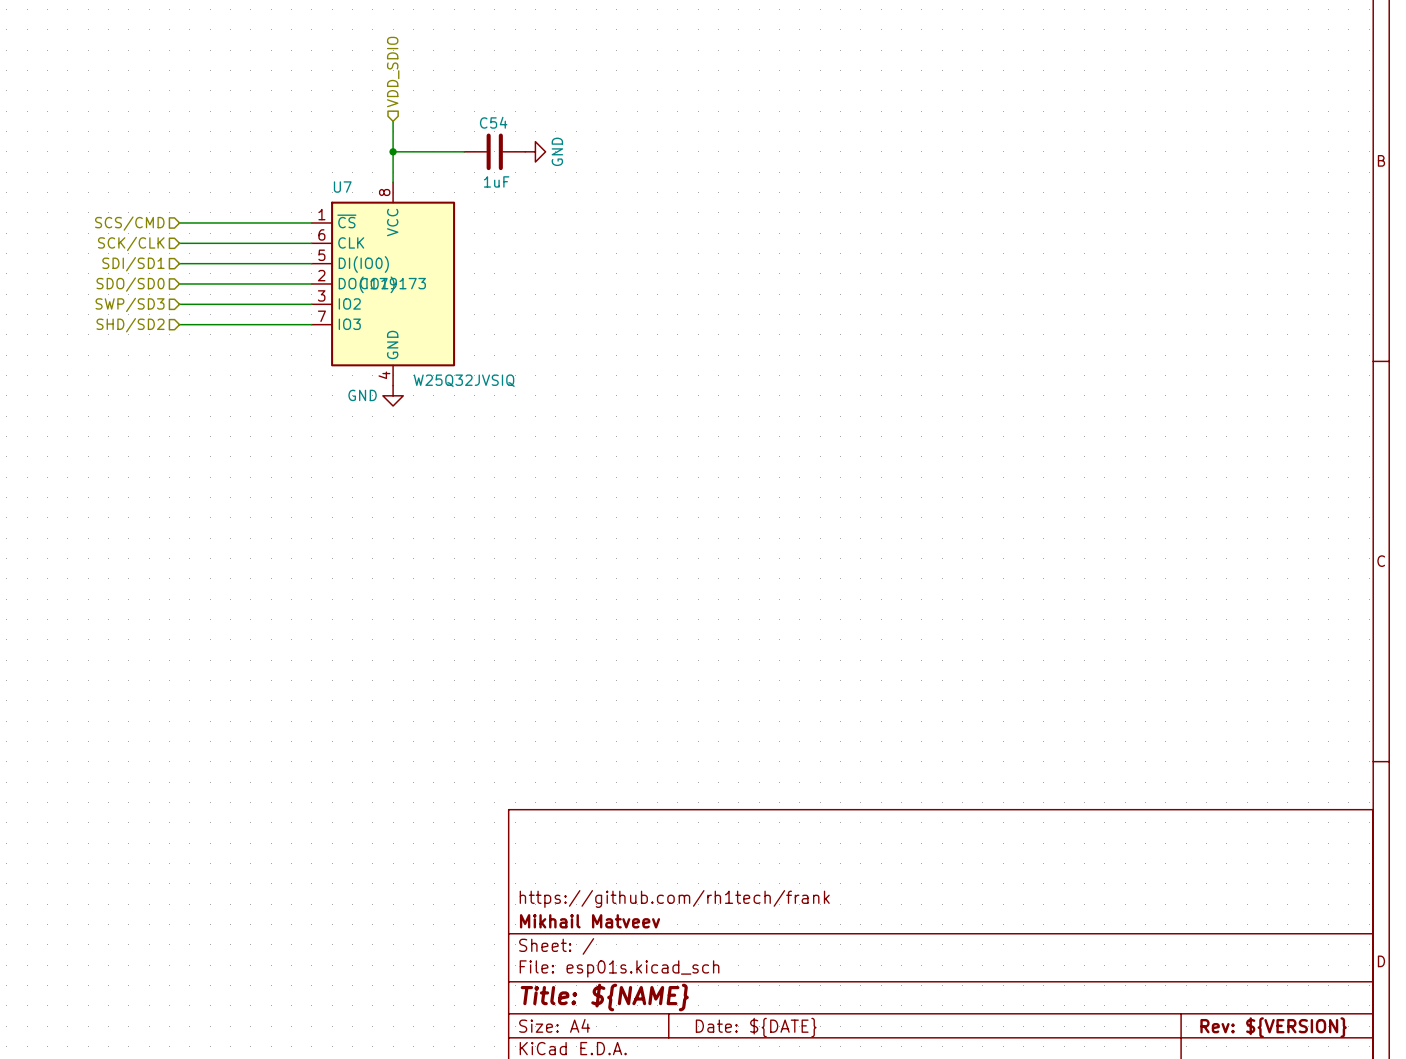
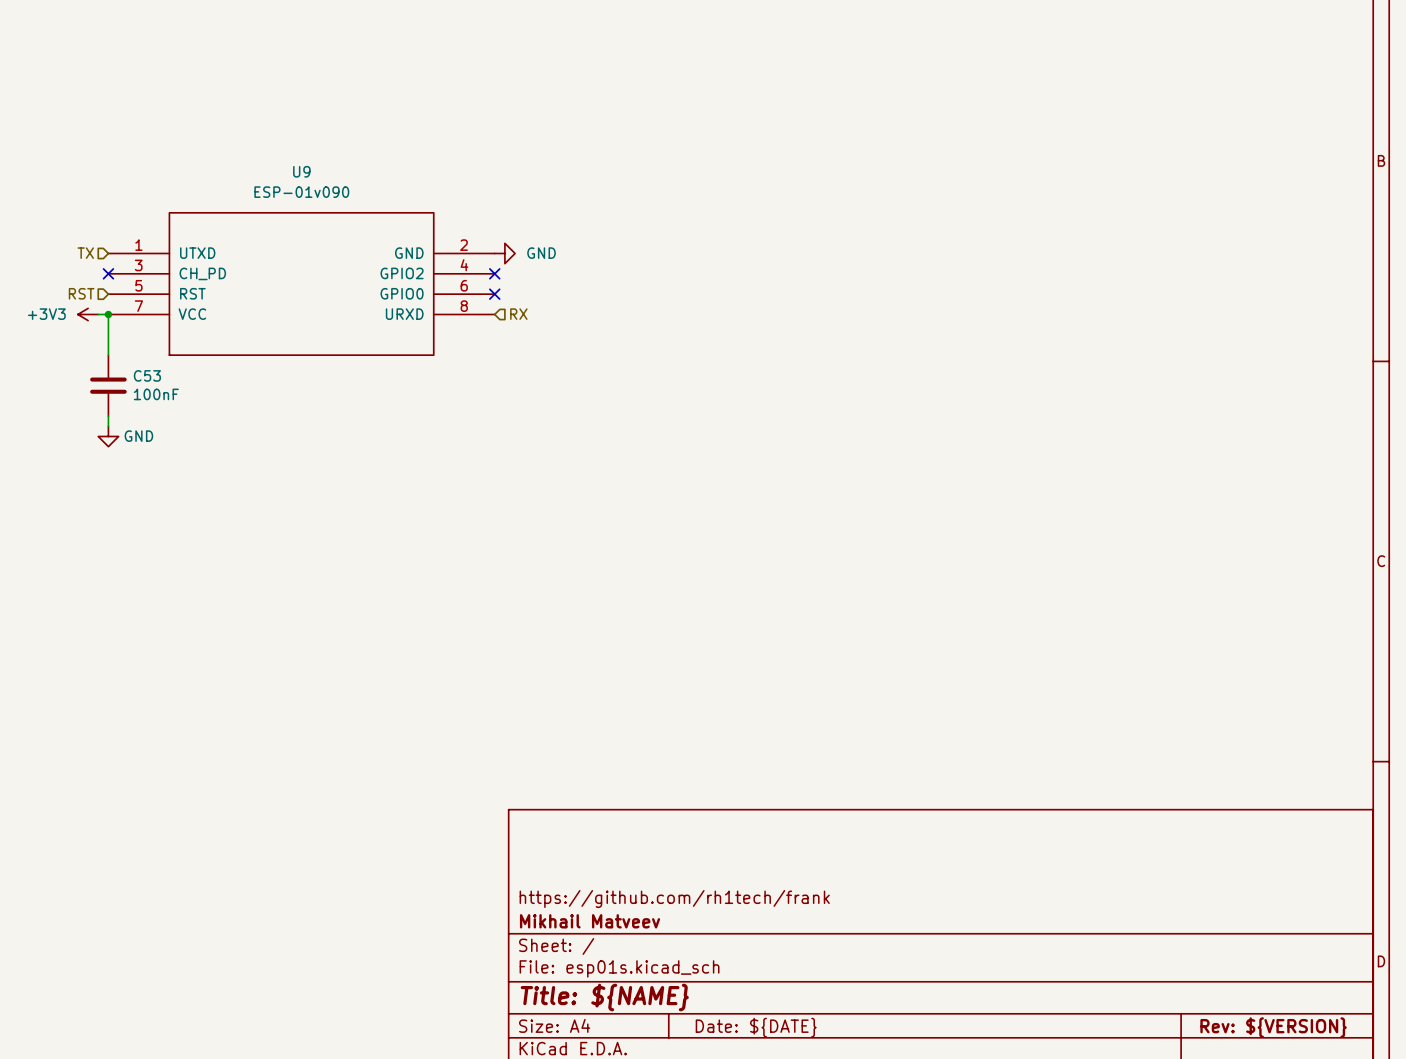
hierarchical label: VDD_SDIO (393, 72) -> none
wire: (393, 121) (393, 182) -> none
wire: (393, 151) (464, 151) -> none
junction: (393, 151) -> none
C54: 1uF (494, 151) -> none
power symbol: GND (535, 151) -> none
wire: (179, 222) (311, 222) -> none
hierarchical label: SCS/CMD (129, 223) -> none
hierarchical label: SCK/CLK (131, 243) -> none
wire: (179, 243) (311, 243) -> none
hierarchical label: none -> TX (85, 253)
power symbol: none -> GND (504, 253)
wire: (179, 263) (311, 263) -> none
hierarchical label: SDI/SD1 (133, 264) -> none
no-connect mark: none -> (108, 273)
no-connect mark: none -> (494, 273)
wire: (179, 283) (311, 283) -> none
U9: none -> ESP-01v090 (301, 283)
U7: W25Q32JVSIQ (383, 283) -> none
hierarchical label: SDO/SD0 (130, 284) -> none
hierarchical label: none -> RST (81, 293)
no-connect mark: none -> (494, 294)
hierarchical label: SWP/SD3 (130, 304) -> none
wire: (179, 304) (311, 304) -> none
power symbol: none -> +3V3 (88, 314)
wire: none -> (98, 314) (108, 314) (108, 355)
junction: none -> (108, 314)
hierarchical label: none -> RX (518, 314)
wire: (179, 324) (311, 324) -> none
hierarchical label: SHD/SD2 (130, 325) -> none
C53: none -> 100nF (108, 385)
power symbol: GND (393, 395) -> none
wire: none -> (108, 416) (108, 426)
power symbol: none -> GND (108, 436)

